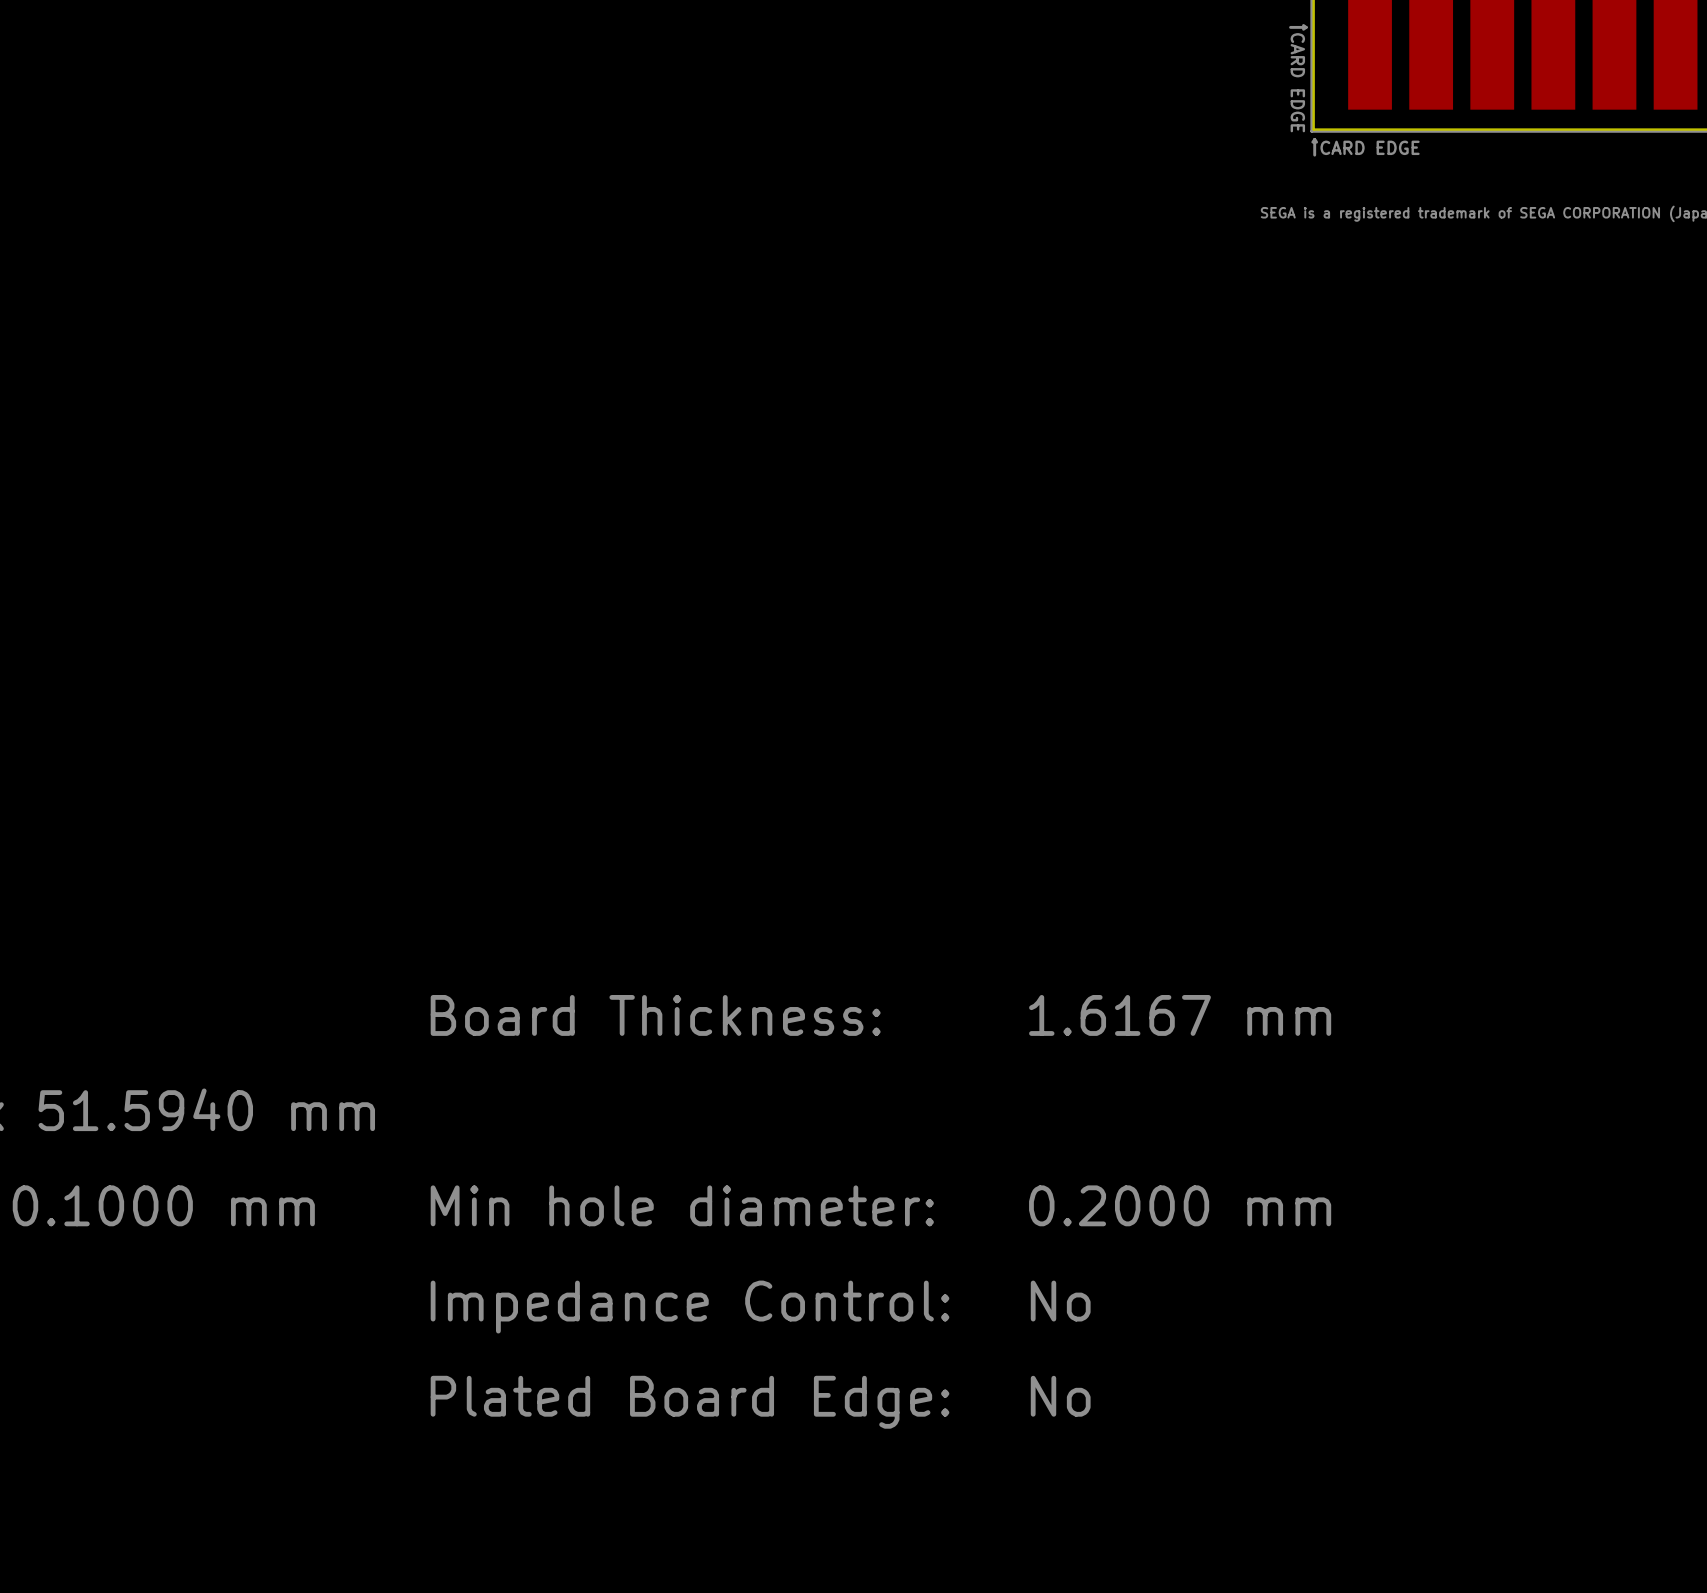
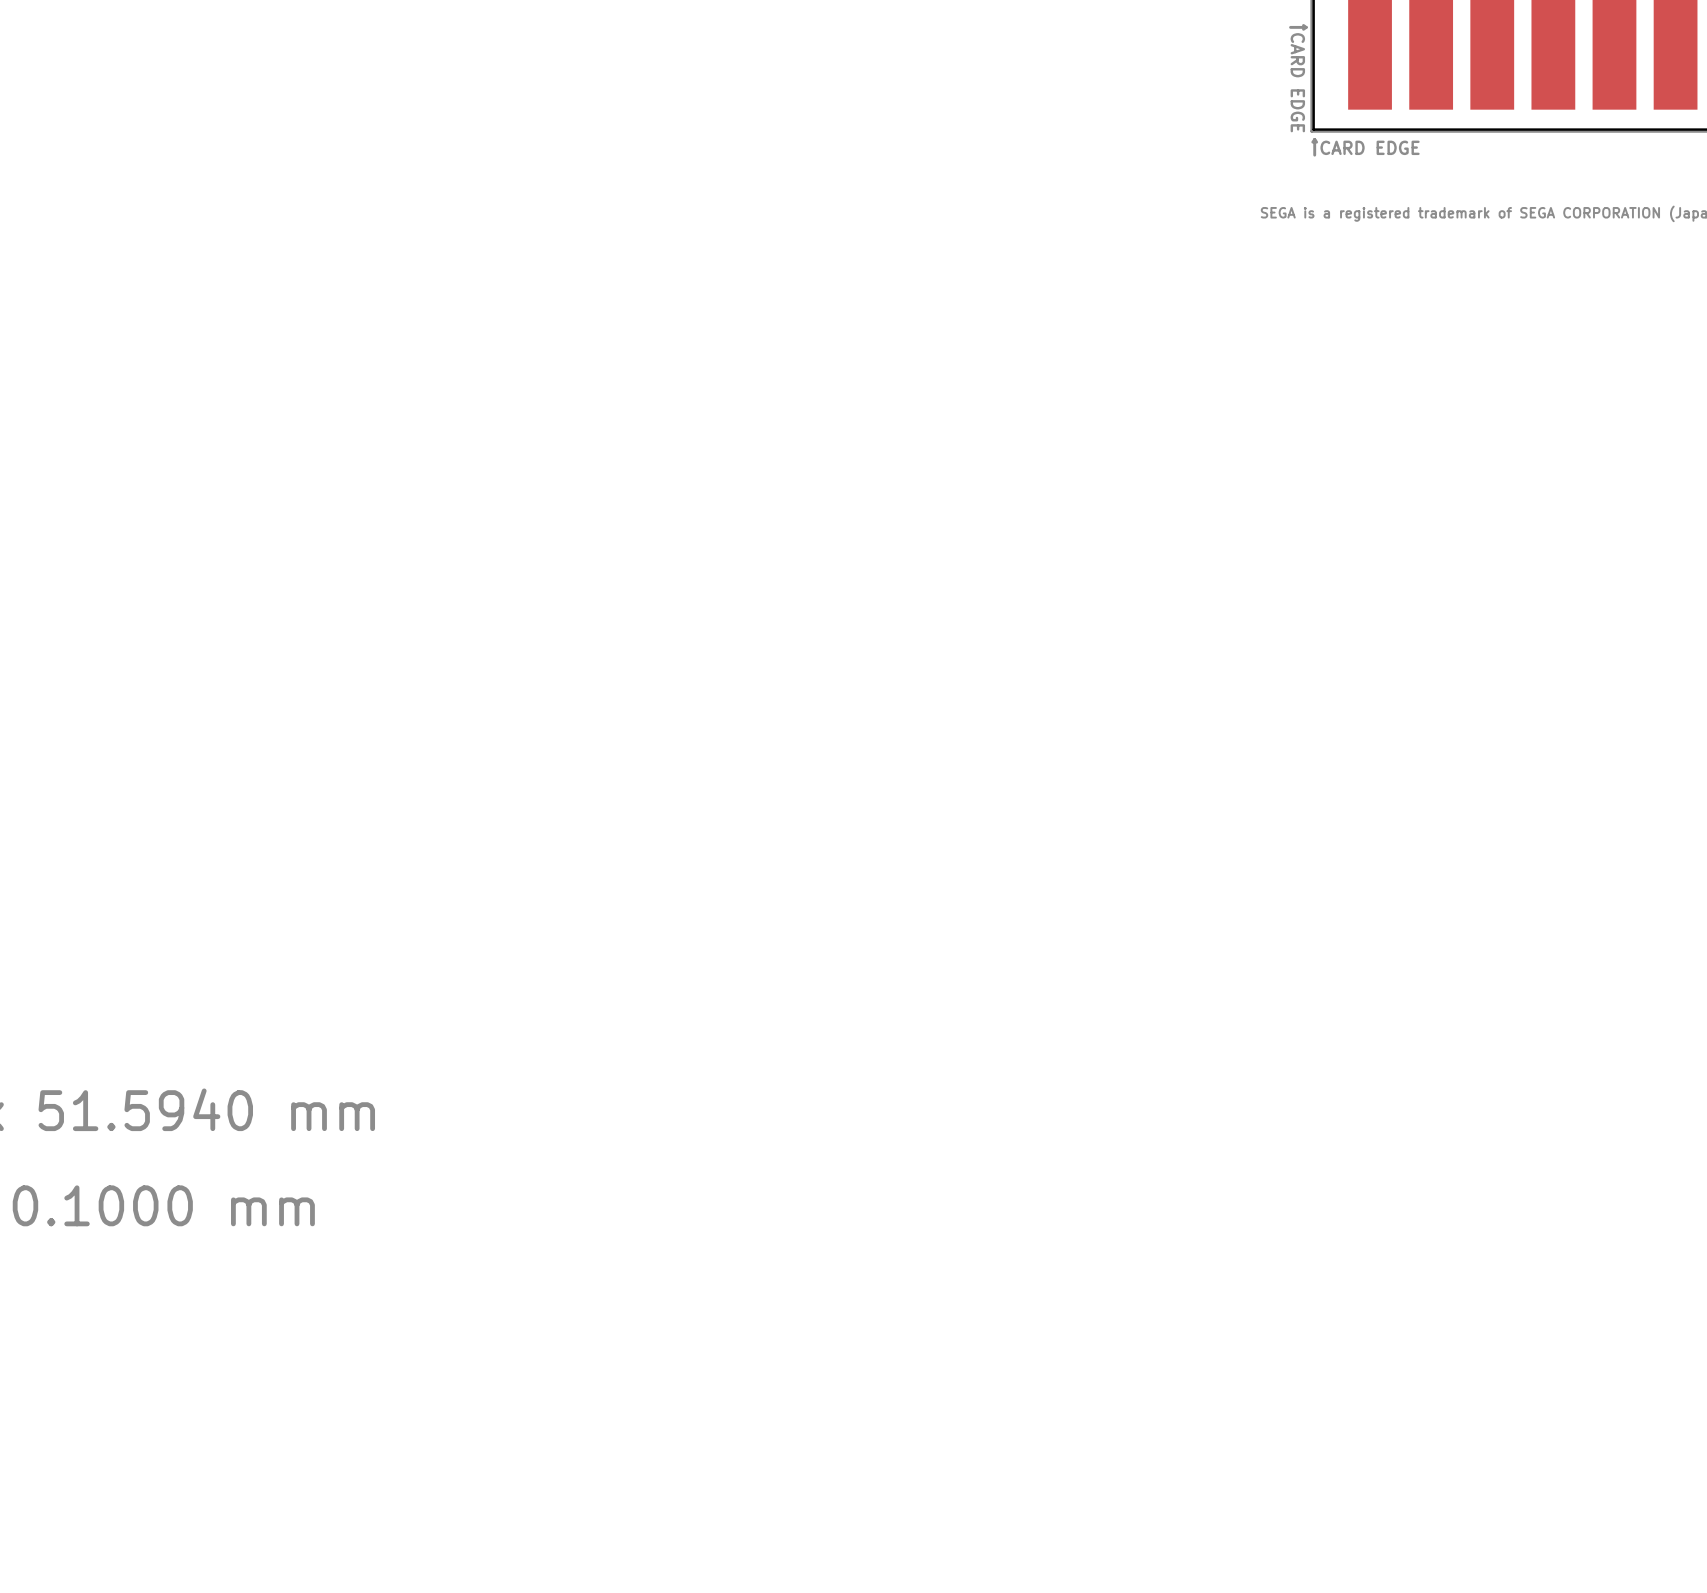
text: Board Thickness: (655, 1015) -> none
text: 1.6167 mm (1180, 1015) -> none
text: Min hole diameter: (682, 1205) -> none
text: 0.2000 mm (1180, 1205) -> none
text: No (1060, 1301) -> none
text: Impedance Control: (690, 1307) -> none
text: No (1060, 1396) -> none
text: Plated Board Edge: (690, 1402) -> none

